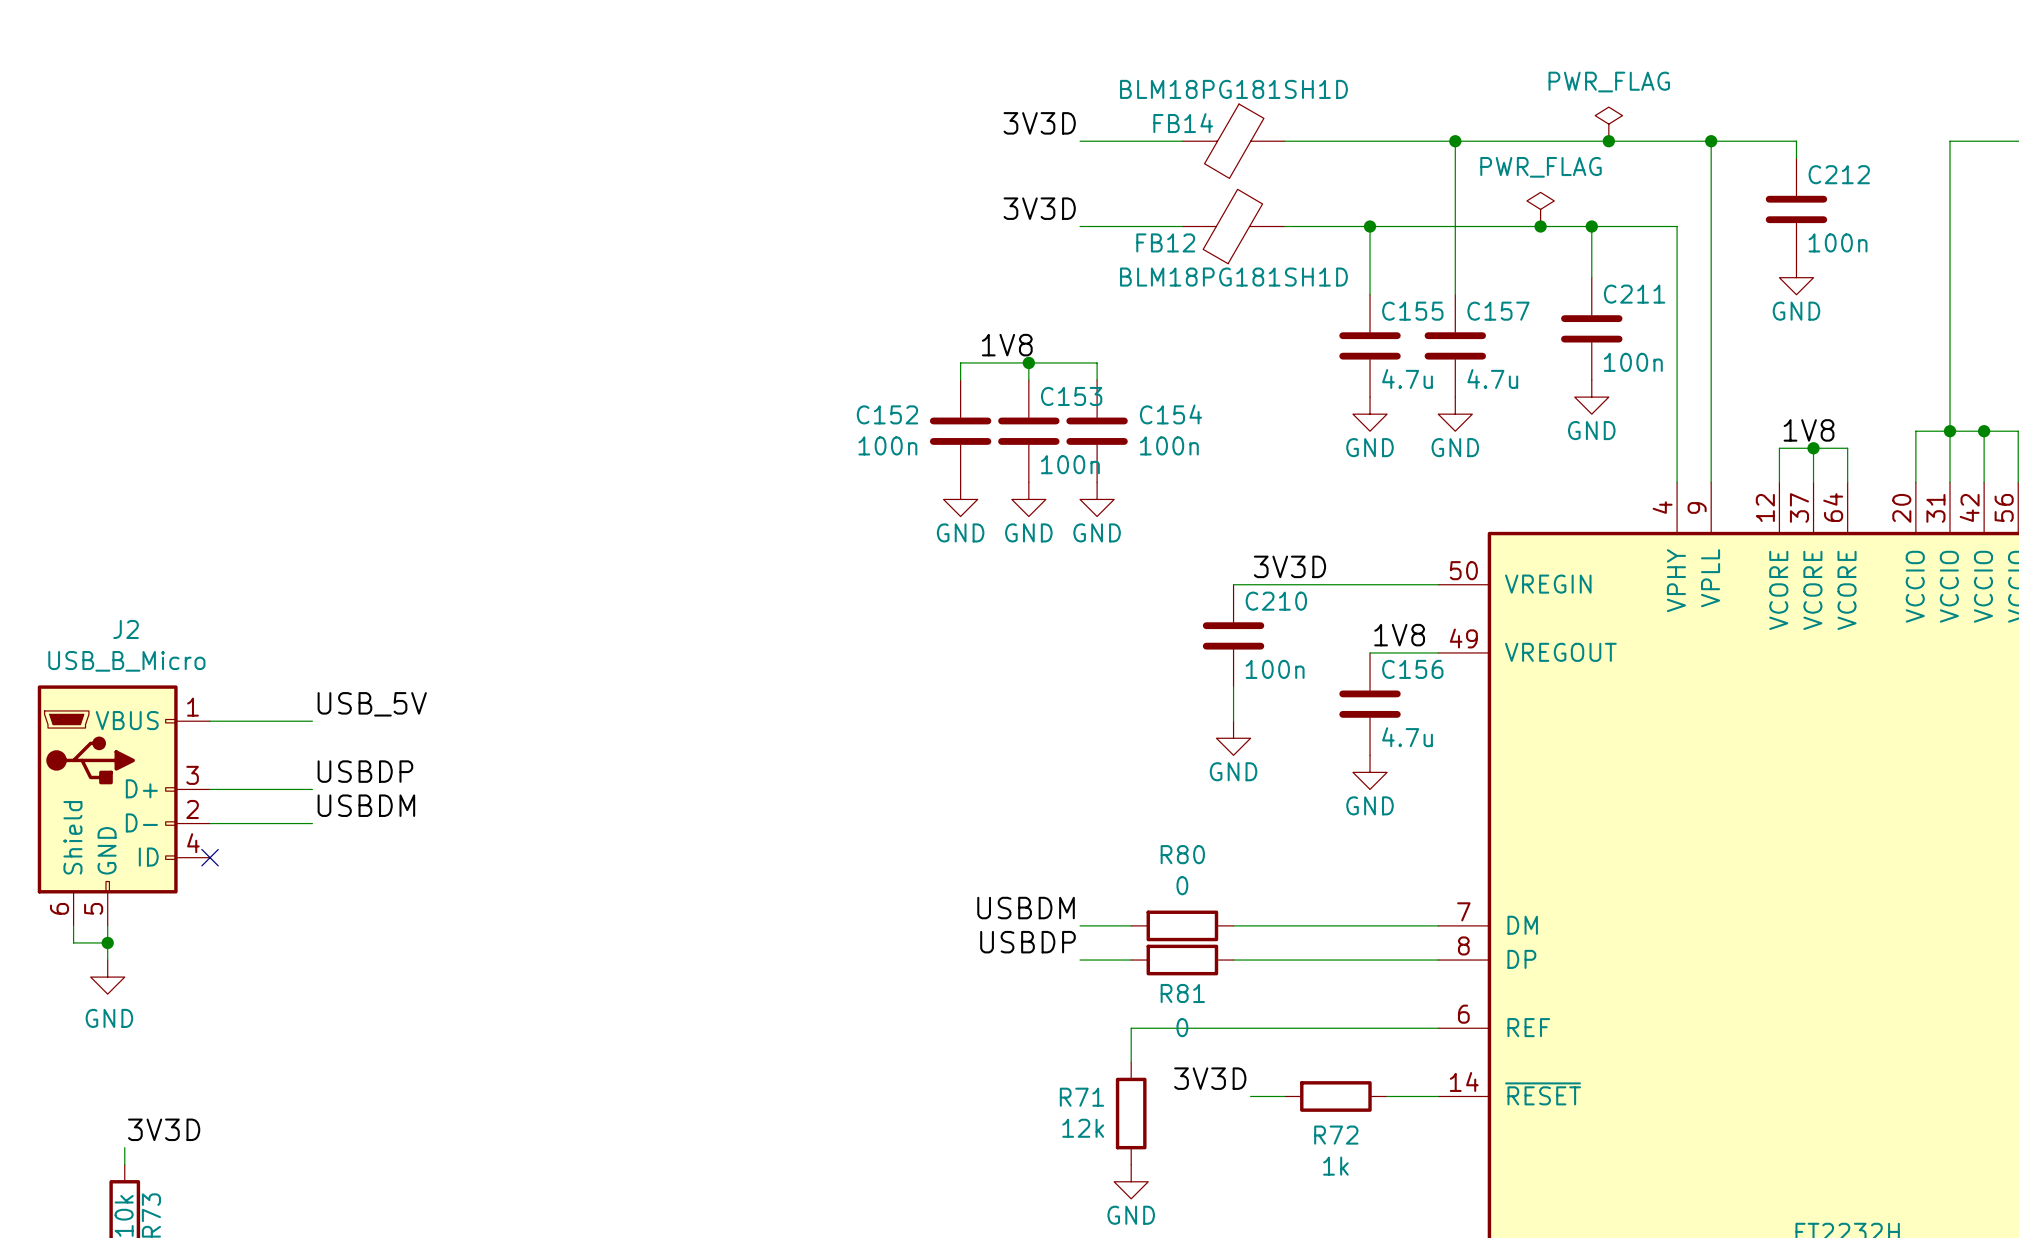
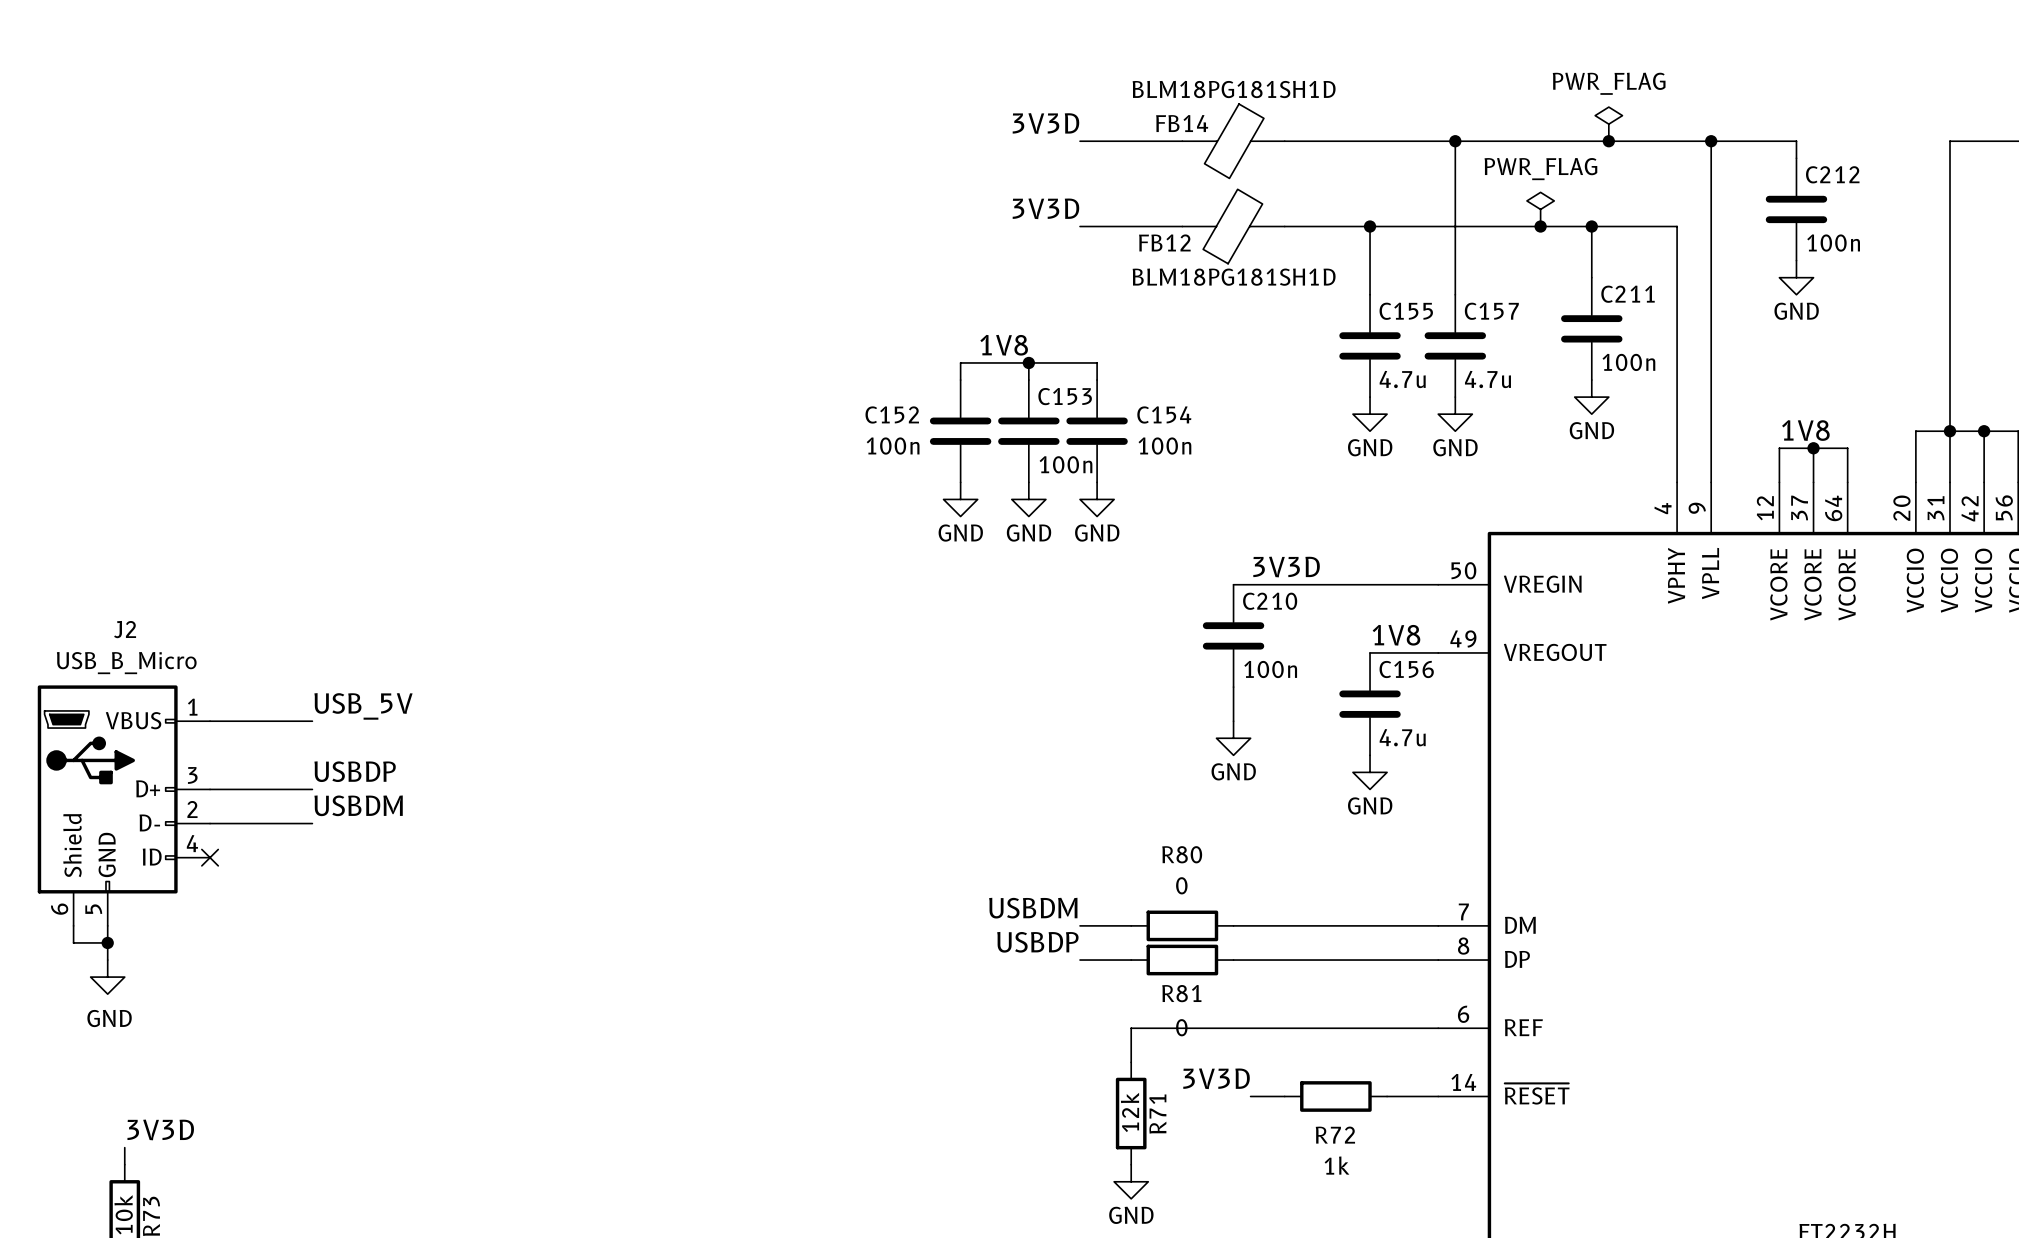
R71 name rotation: 0° (1081, 1097) -> 90° counterclockwise (1157, 1114)
R71 name position: R71 (1081, 1097) -> R71 (1157, 1114)
R71 value rotation: 0° (1083, 1128) -> 90° counterclockwise (1130, 1112)

